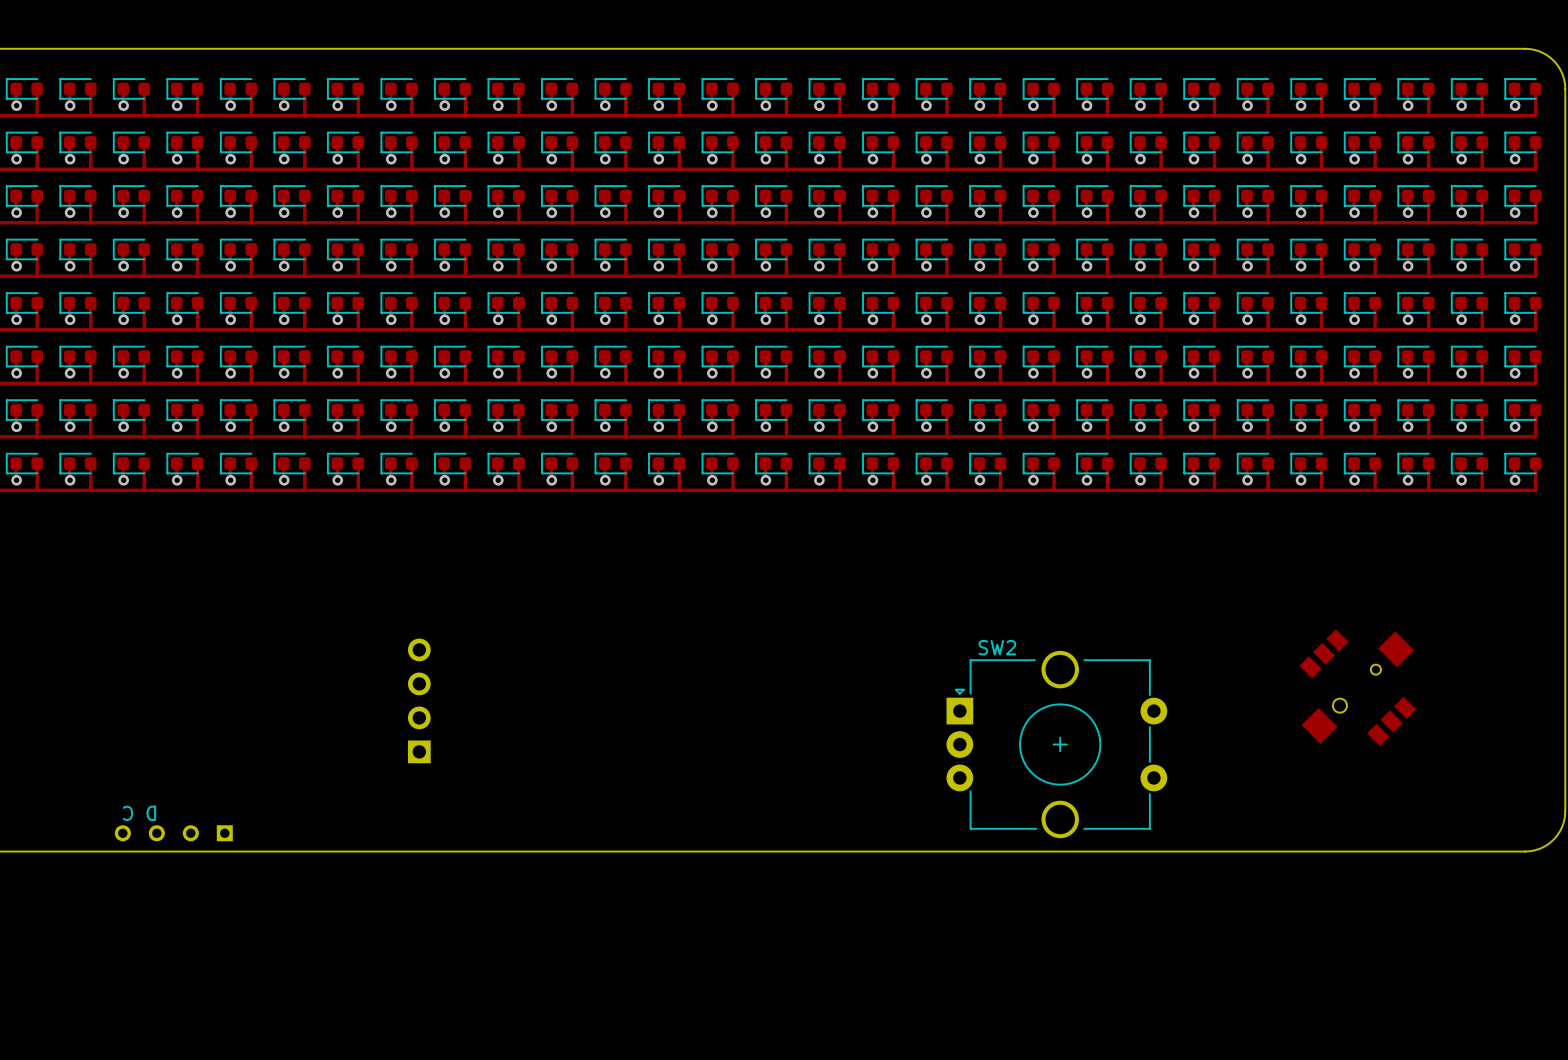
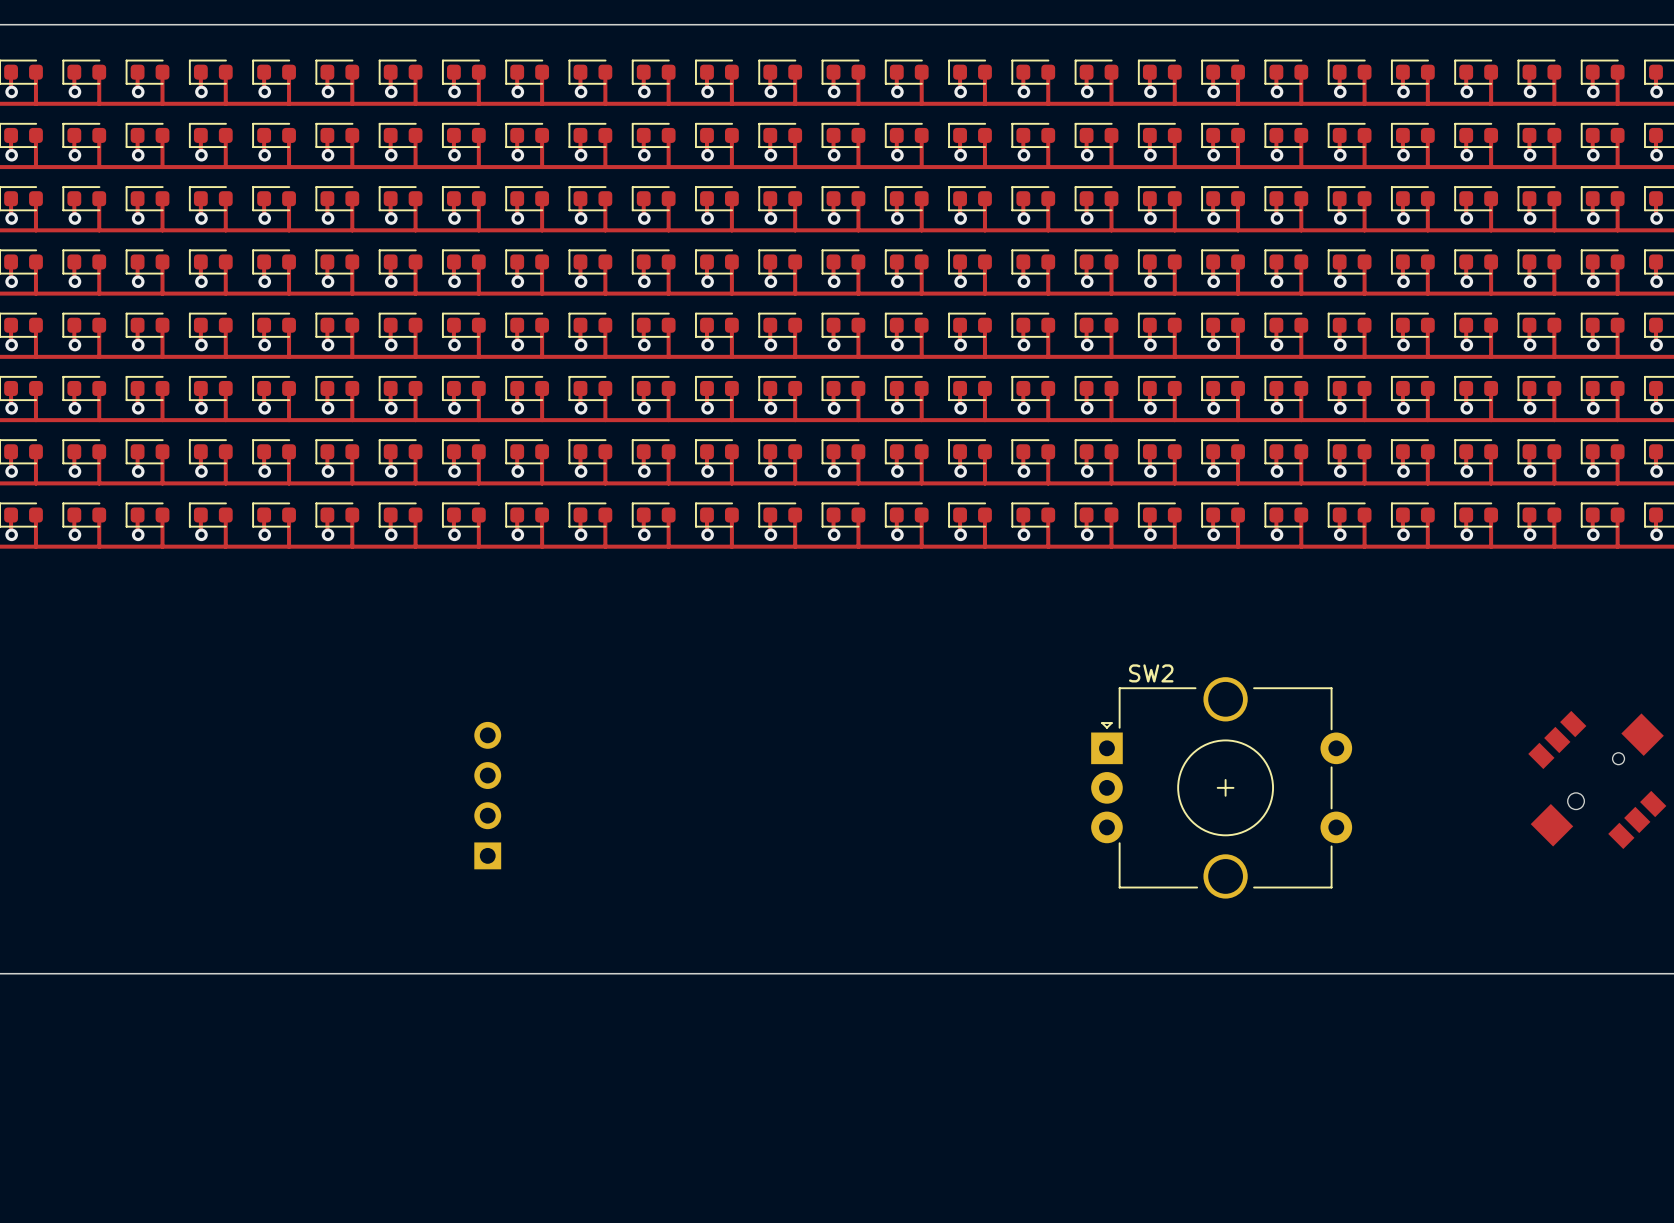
SW2 position: (1056, 744) -> (1221, 787)
part: (173, 833) -> none

